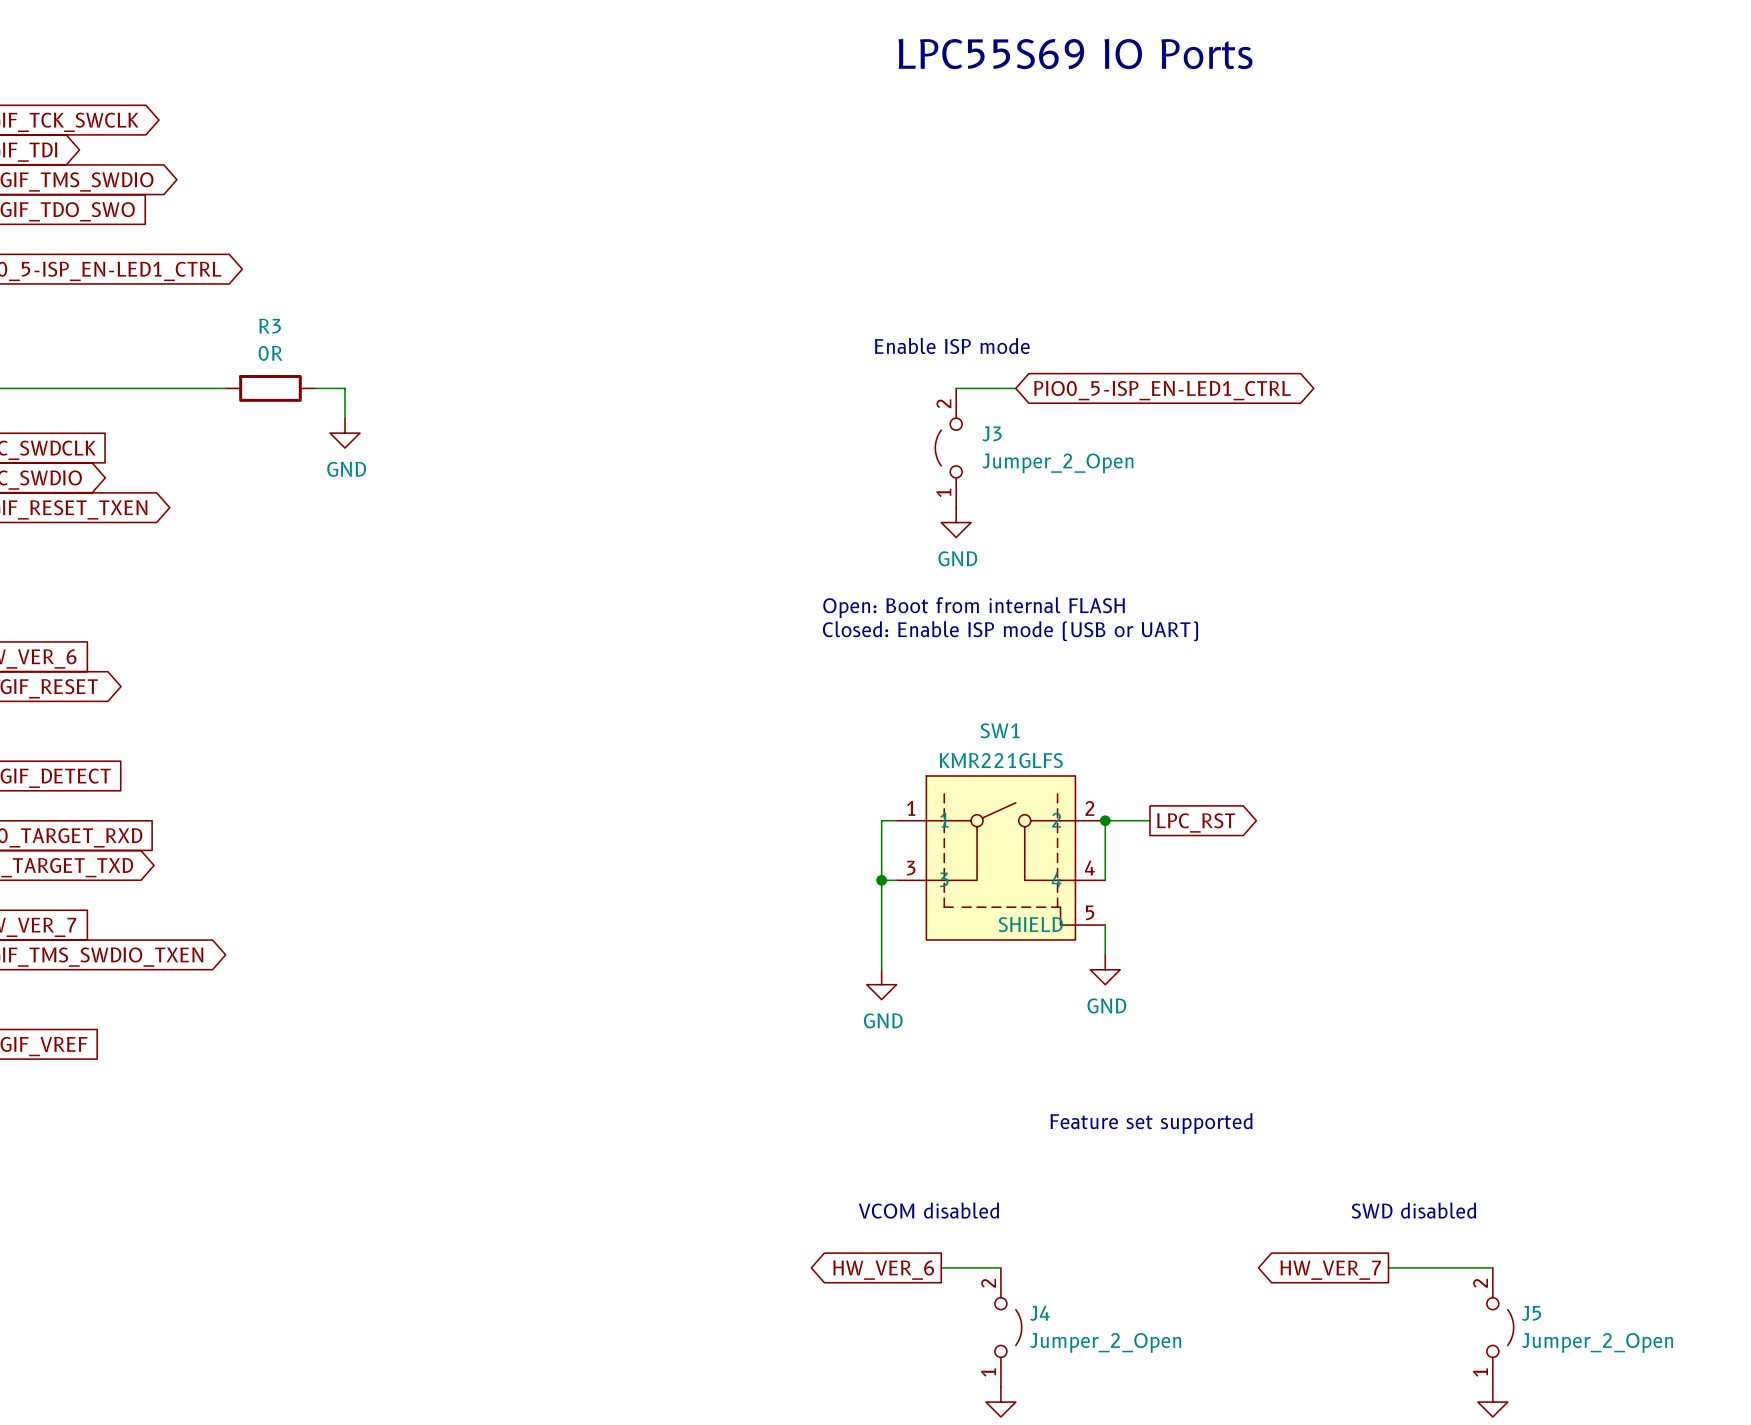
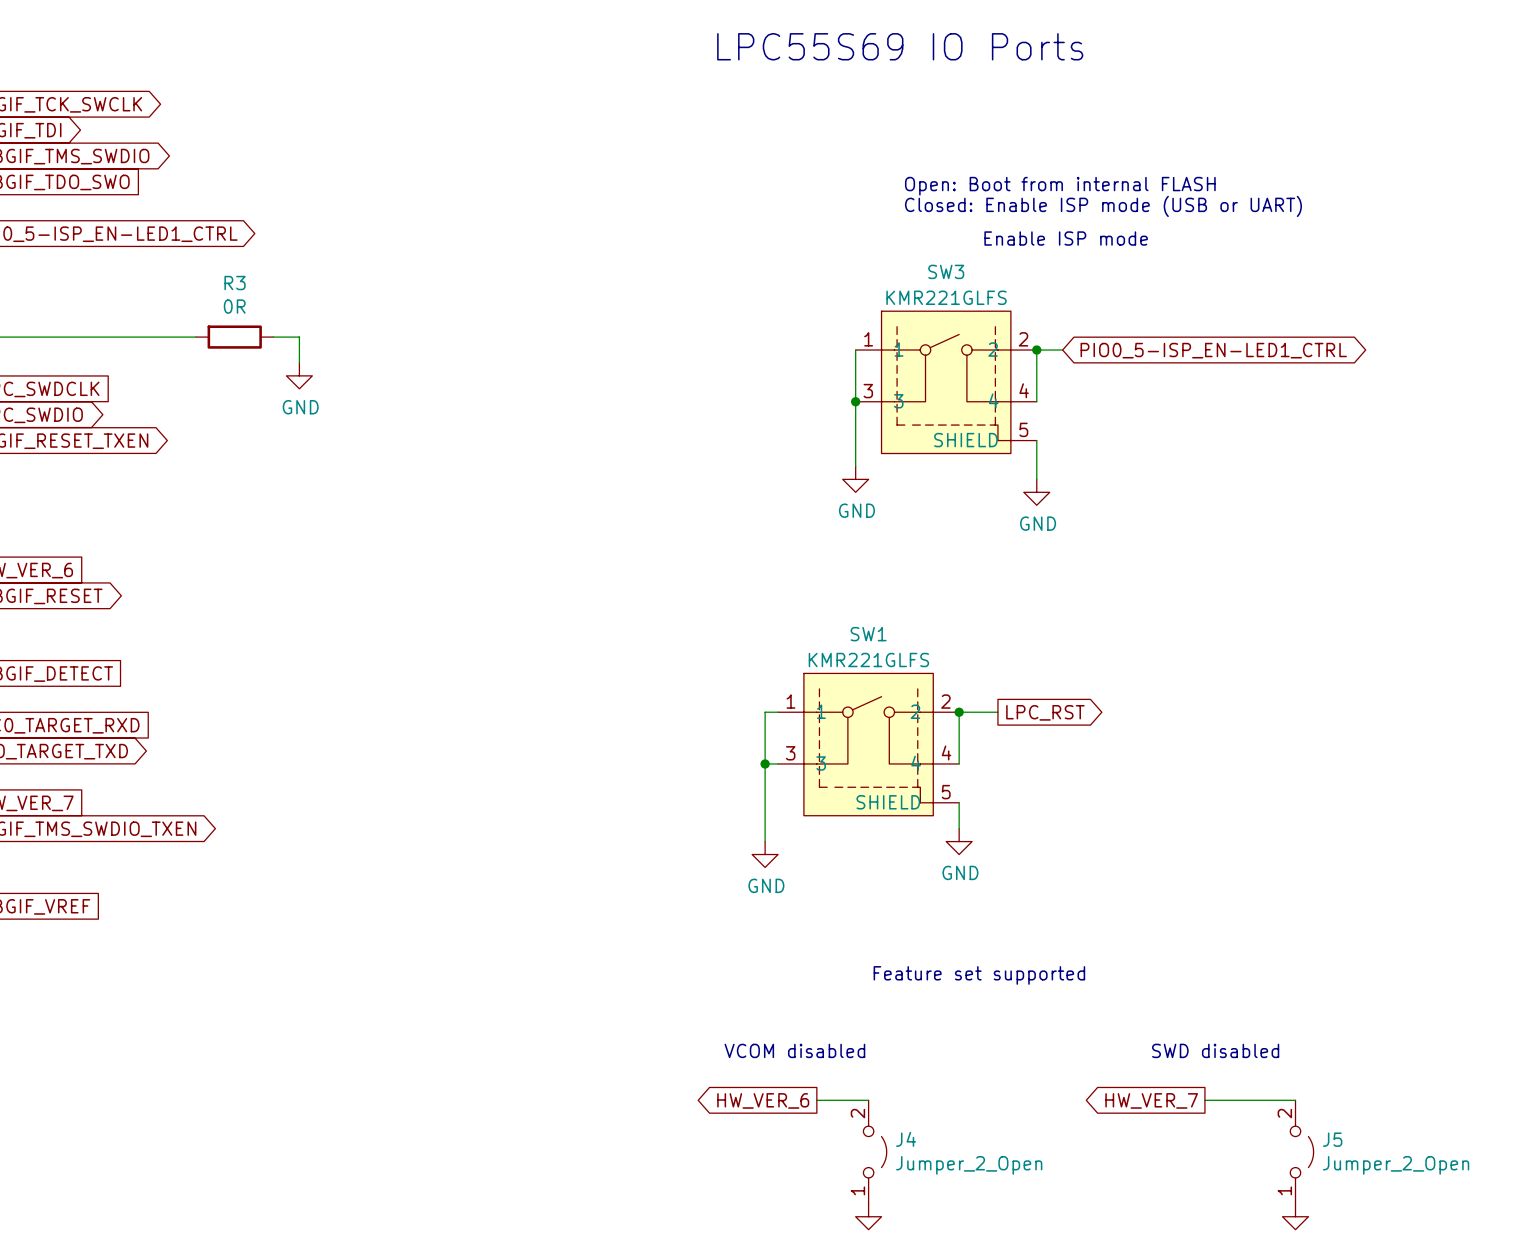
text: none -> Open: Boot from internal FLASH (1060, 186)
text: none -> Closed: Enable ISP mode (USB or UART) (1103, 206)
text: none -> Enable ISP mode (1066, 238)
text: Enable ISP mode (952, 345) -> none
wire: (956, 388) (1015, 388) -> none
global label position: PIO0_5-ISP_EN-LED1_CTRL (1162, 390) -> PIO0_5-ISP_EN-LED1_CTRL (1213, 350)
wire: none -> (855, 350) (855, 466)
junction: none -> (1036, 350)
wire: none -> (1062, 350) (1036, 350) (1036, 401)
SW3: none -> KMR221GLFS (946, 382)
J3: Jumper_2_Open (948, 448) -> none
junction: none -> (855, 401)
wire: none -> (1036, 440) (1036, 479)
power symbol position: GND (956, 522) -> GND (855, 479)
power symbol: none -> GND (1036, 492)
text: Open: Boot from internal FLASH (974, 607) -> none
text: Closed: Enable ISP mode (USB or UART) (1010, 631) -> none

